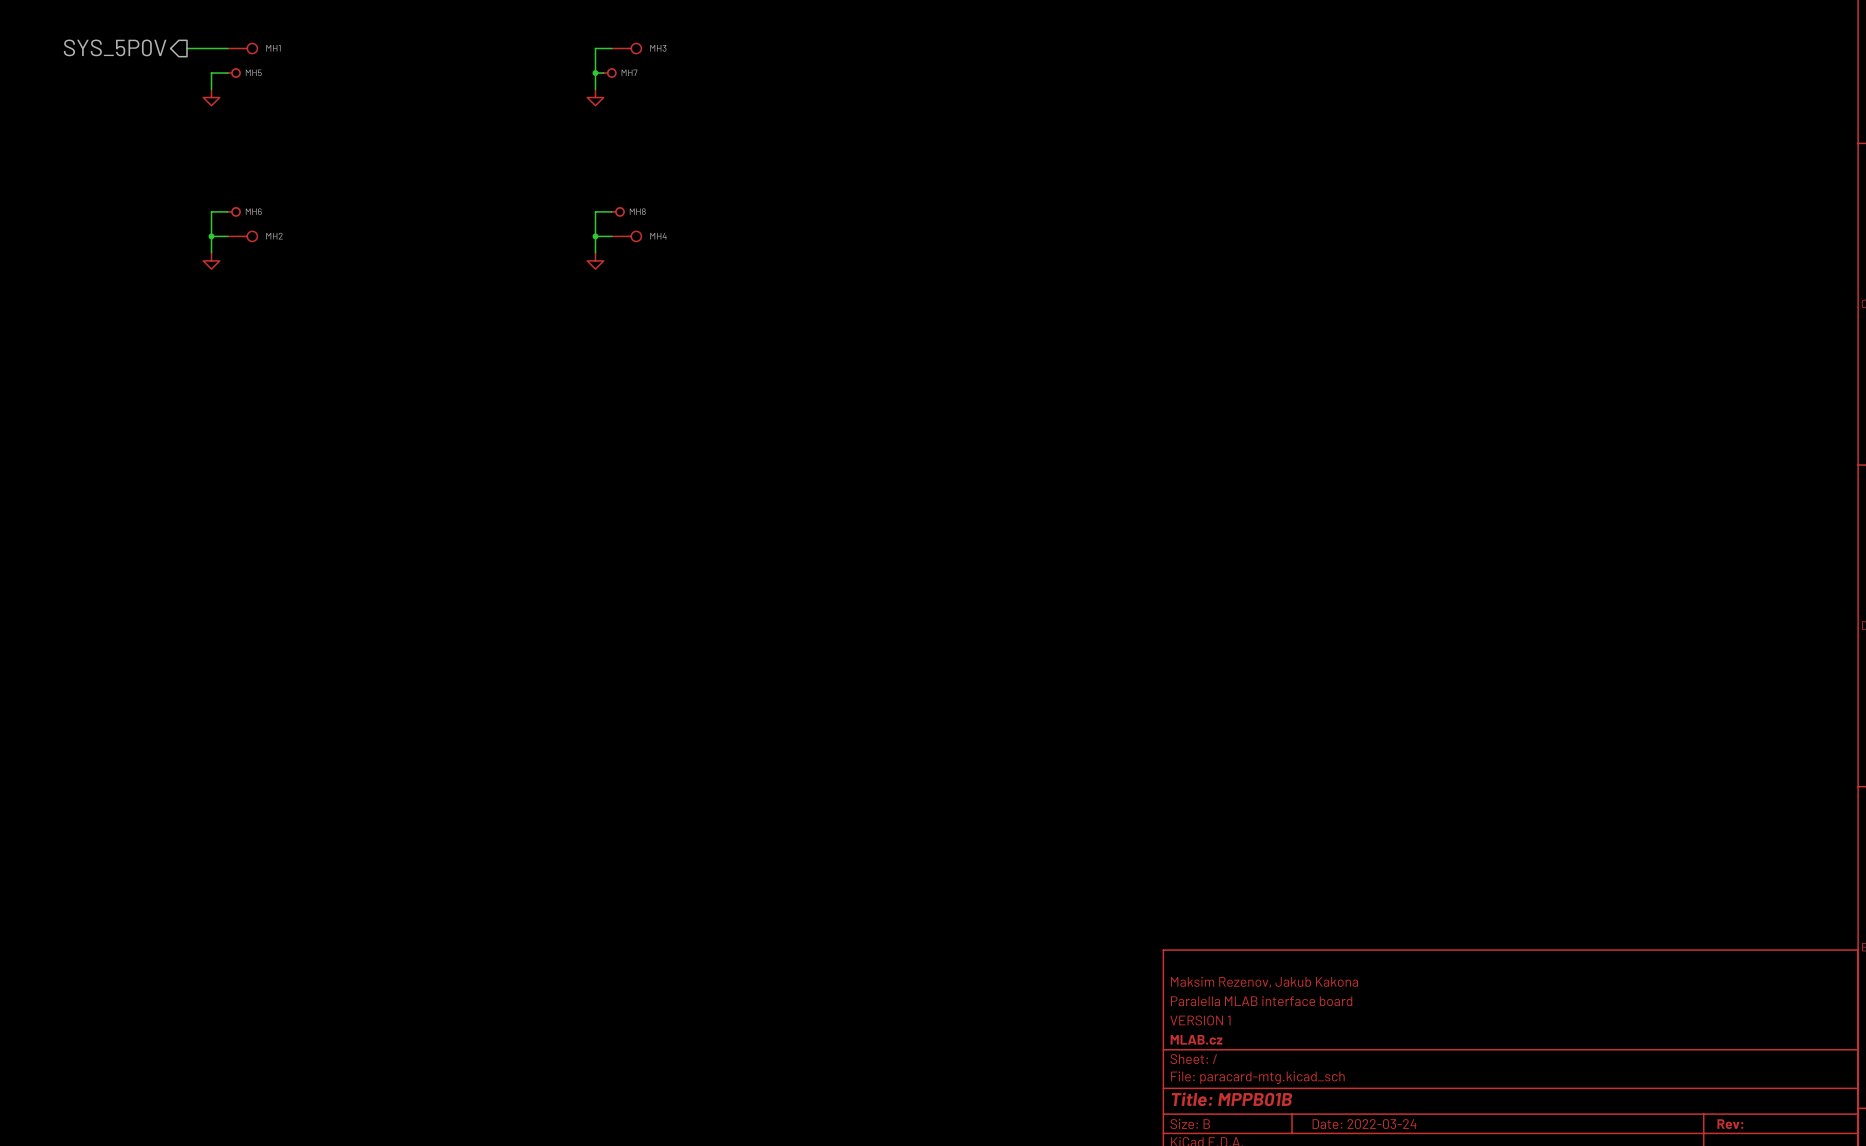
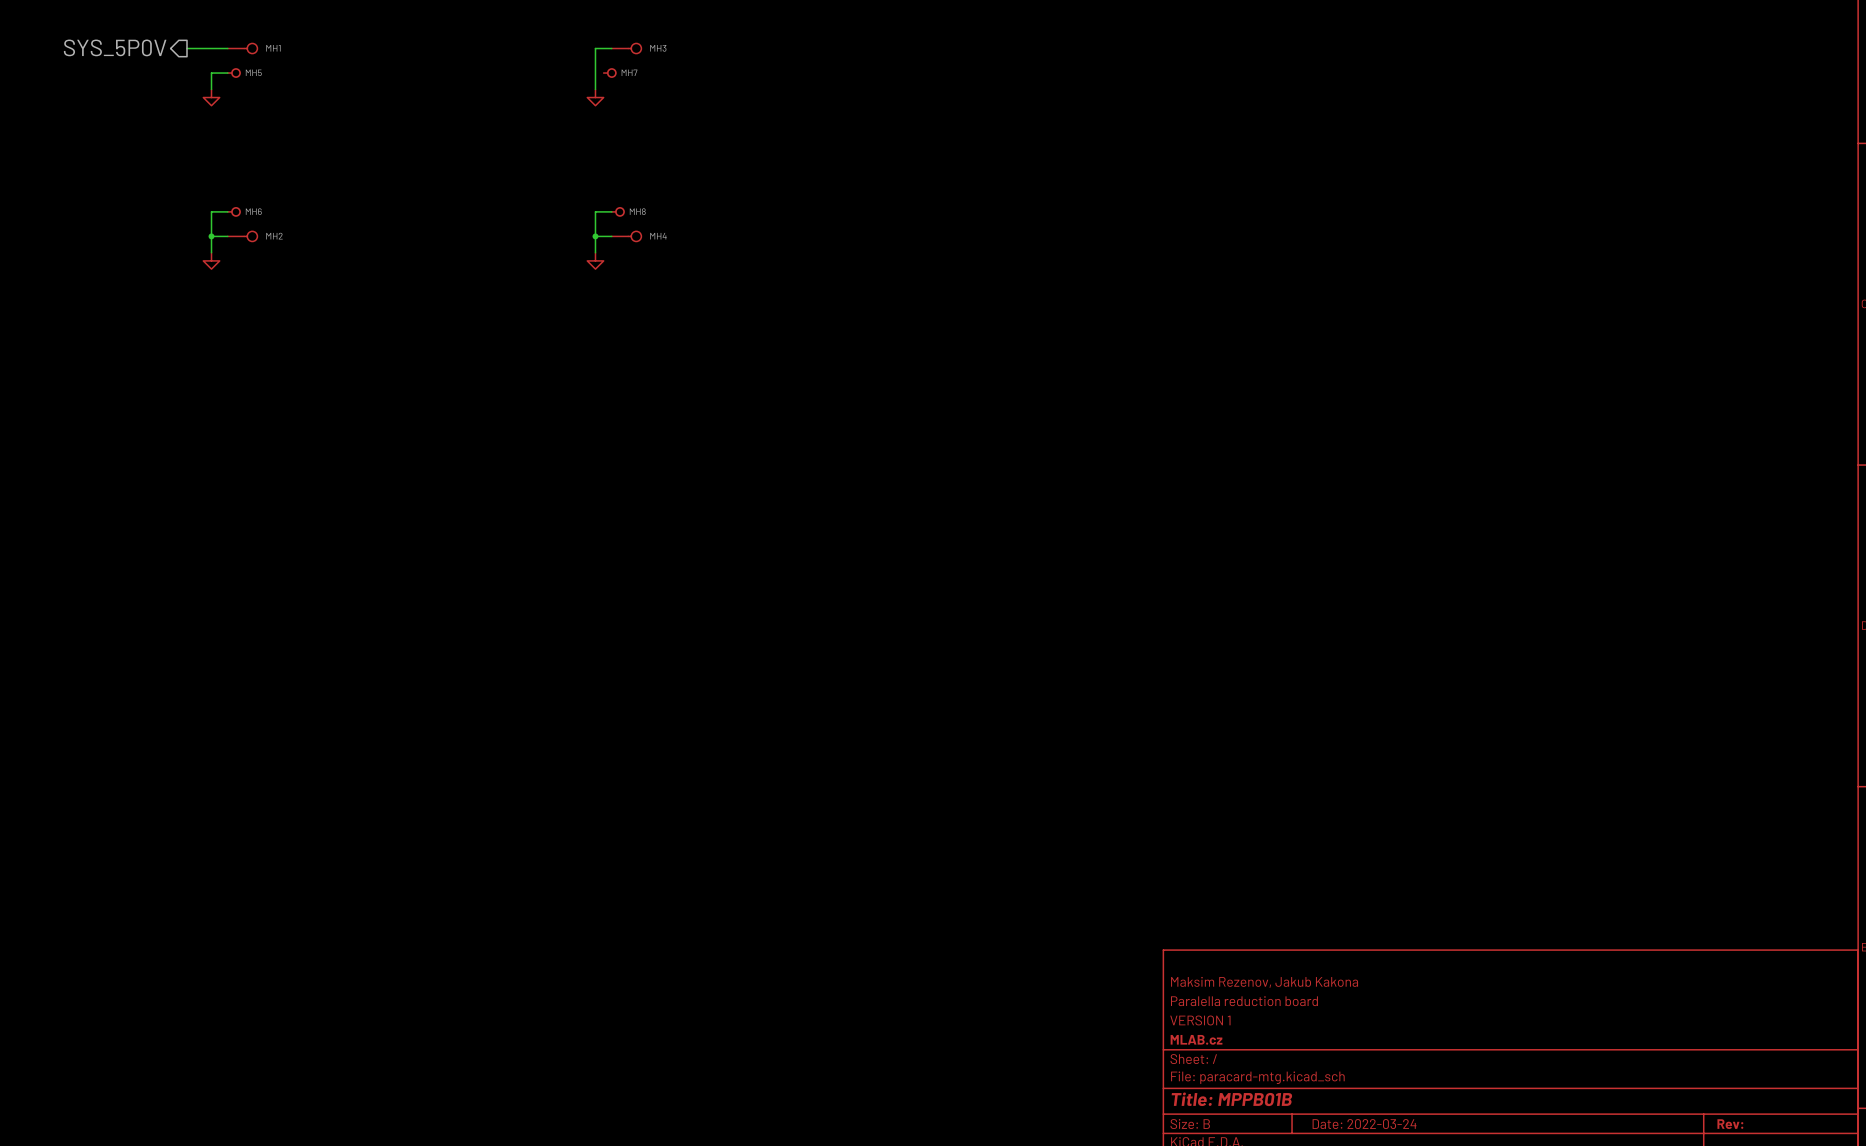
wire: (595, 73) (603, 73) -> none
junction: (595, 73) -> none
title block: Paralella MLAB interface board (1261, 1001) -> Paralella reduction board (1244, 1001)

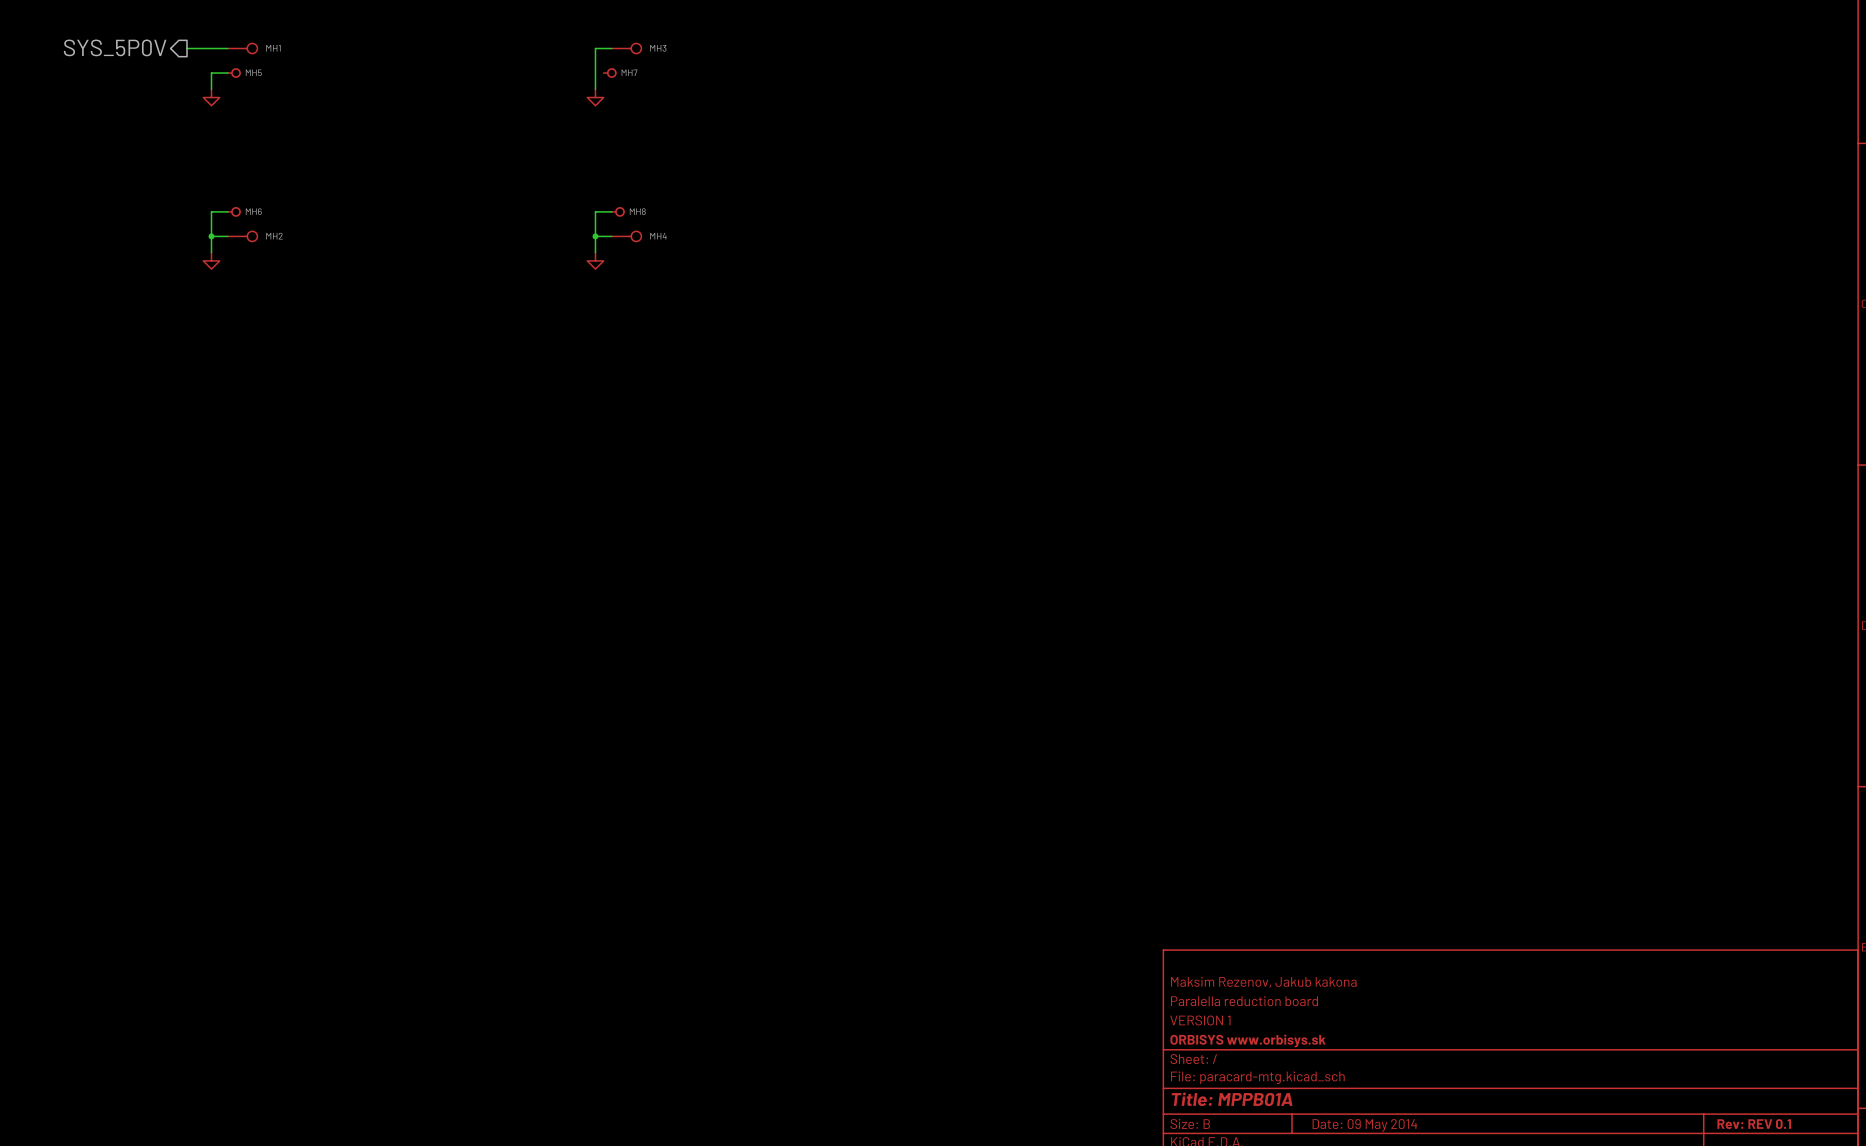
title block: Maksim Rezenov, Jakub Kakona (1264, 982) -> Maksim Rezenov, Jakub kakona (1263, 982)
title block: MLAB.cz (1196, 1039) -> ORBISYS www.orbisys.sk (1247, 1040)
title block: Title: MPPB01B (1232, 1099) -> Title: MPPB01A (1232, 1099)
title block: Date: 2022-03-24 (1364, 1124) -> Date: 09 May 2014 (1364, 1125)
title block: Rev: (1730, 1124) -> Rev: REV 0.1 (1754, 1124)

